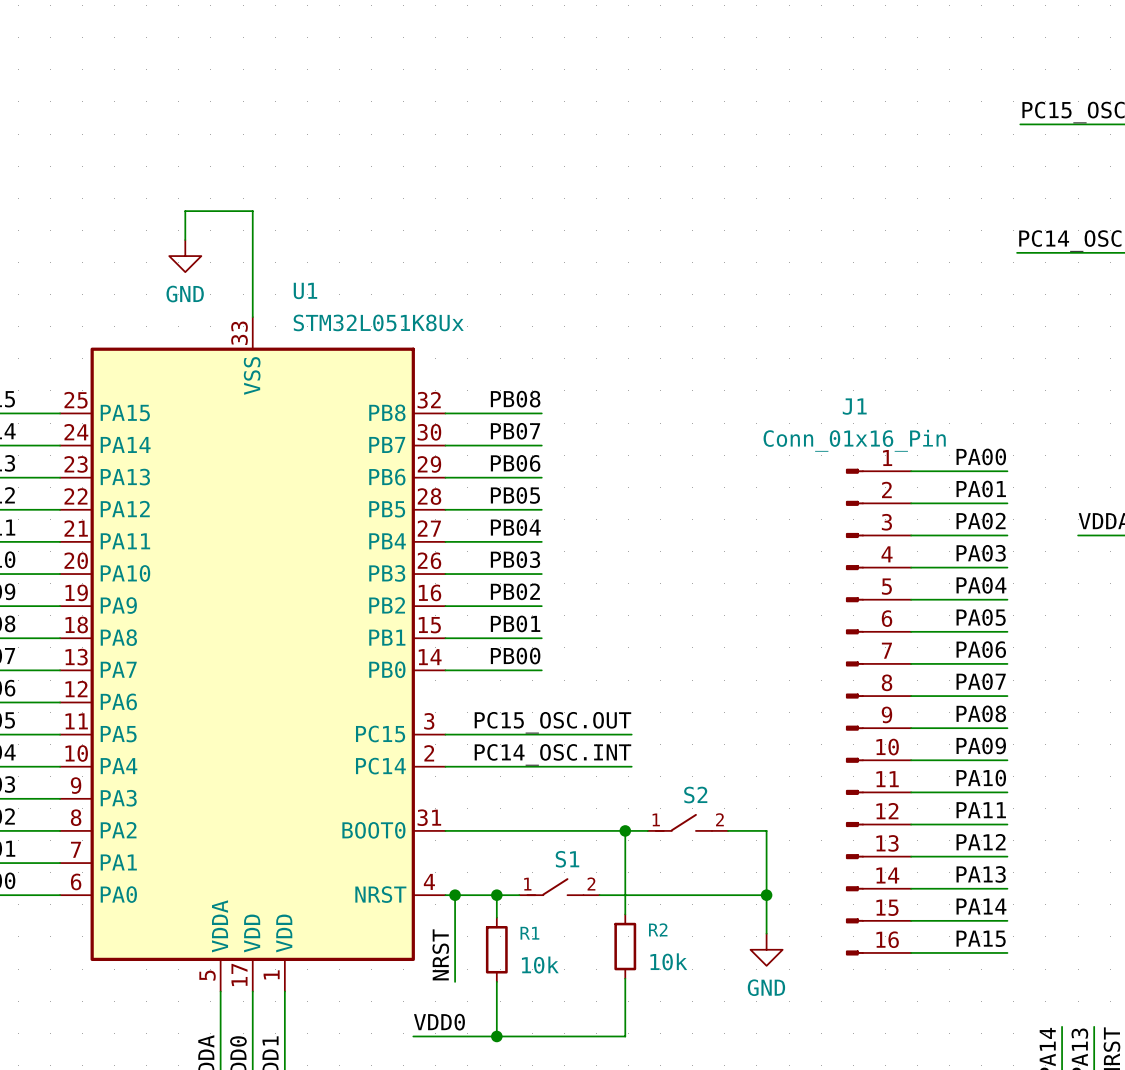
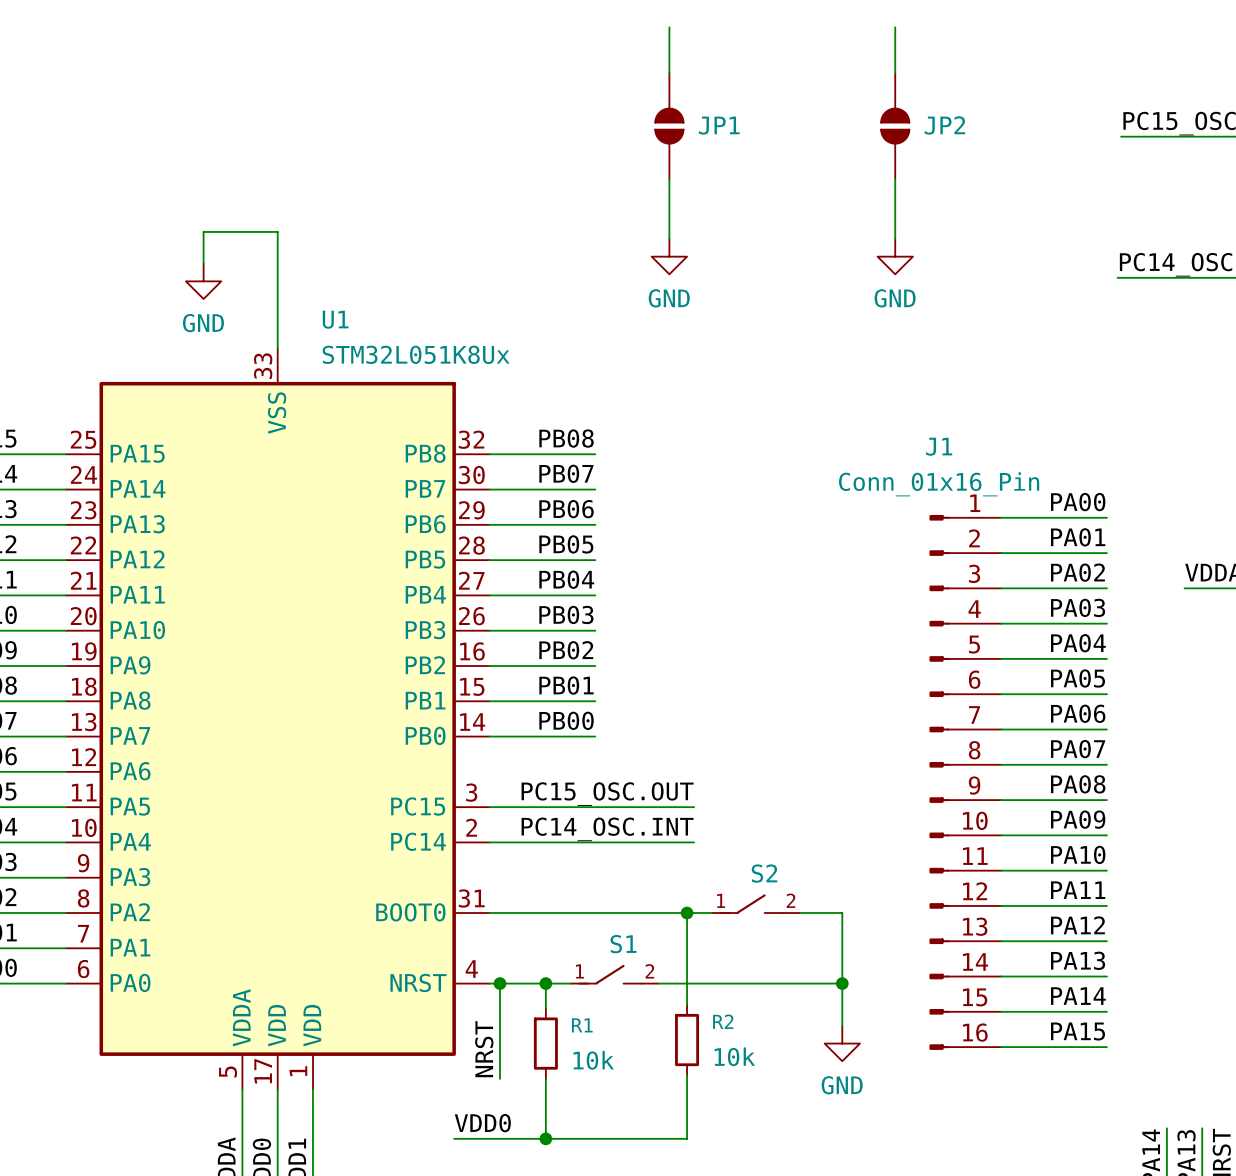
wire: none -> (669, 27) (669, 73)
wire: none -> (895, 27) (895, 73)
JP1: none -> (669, 126)
JP2: none -> (895, 126)
wire: none -> (669, 179) (669, 239)
wire: none -> (895, 179) (895, 239)
power symbol: none -> GND (669, 256)
power symbol: none -> GND (895, 256)

